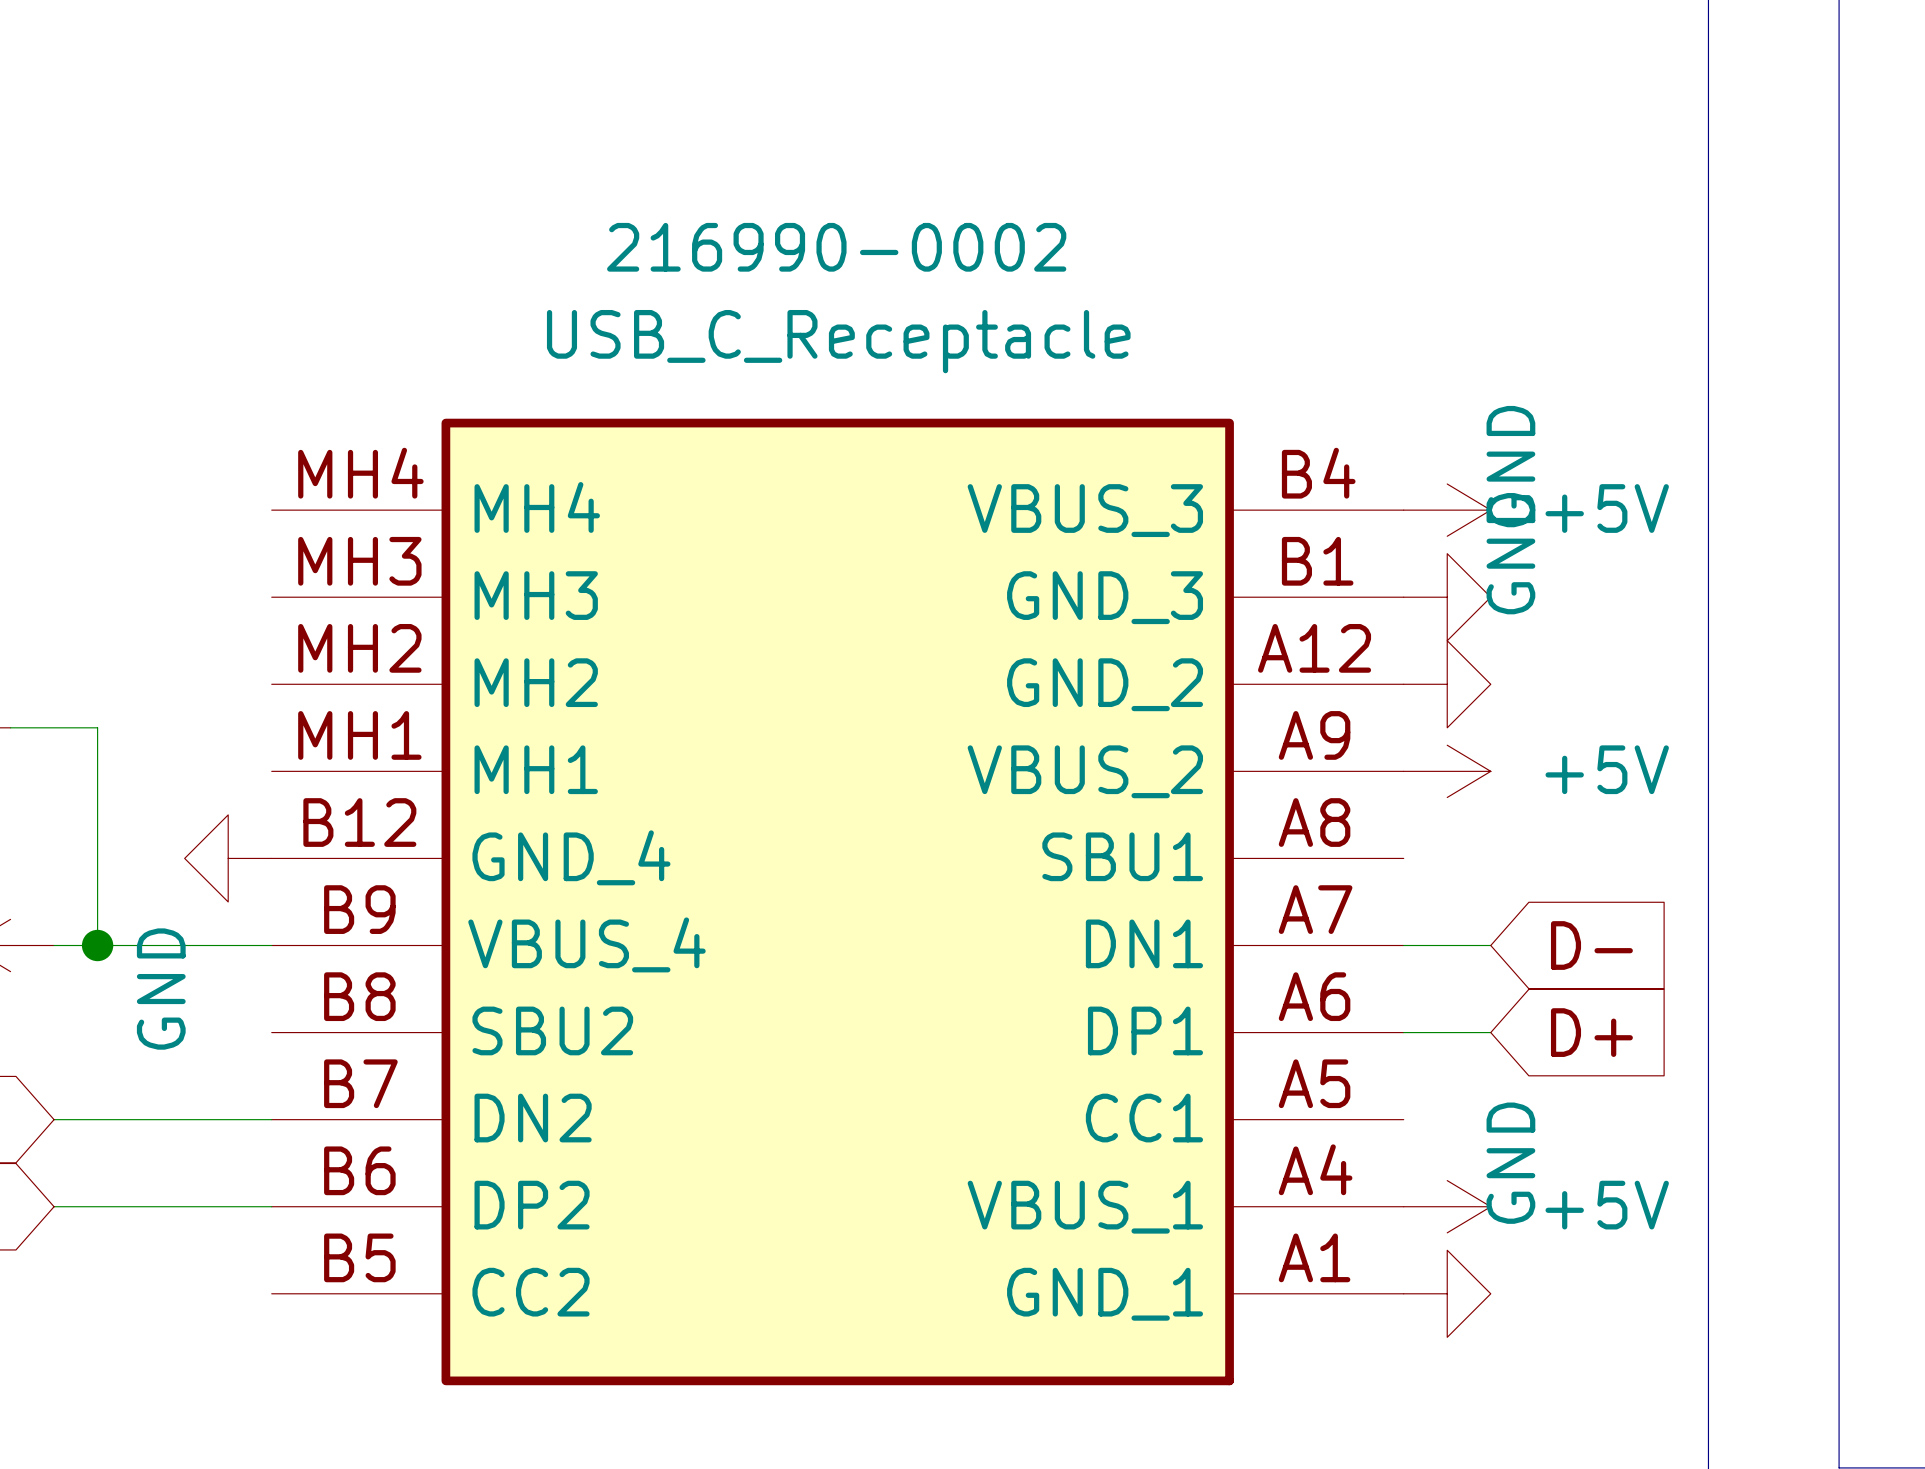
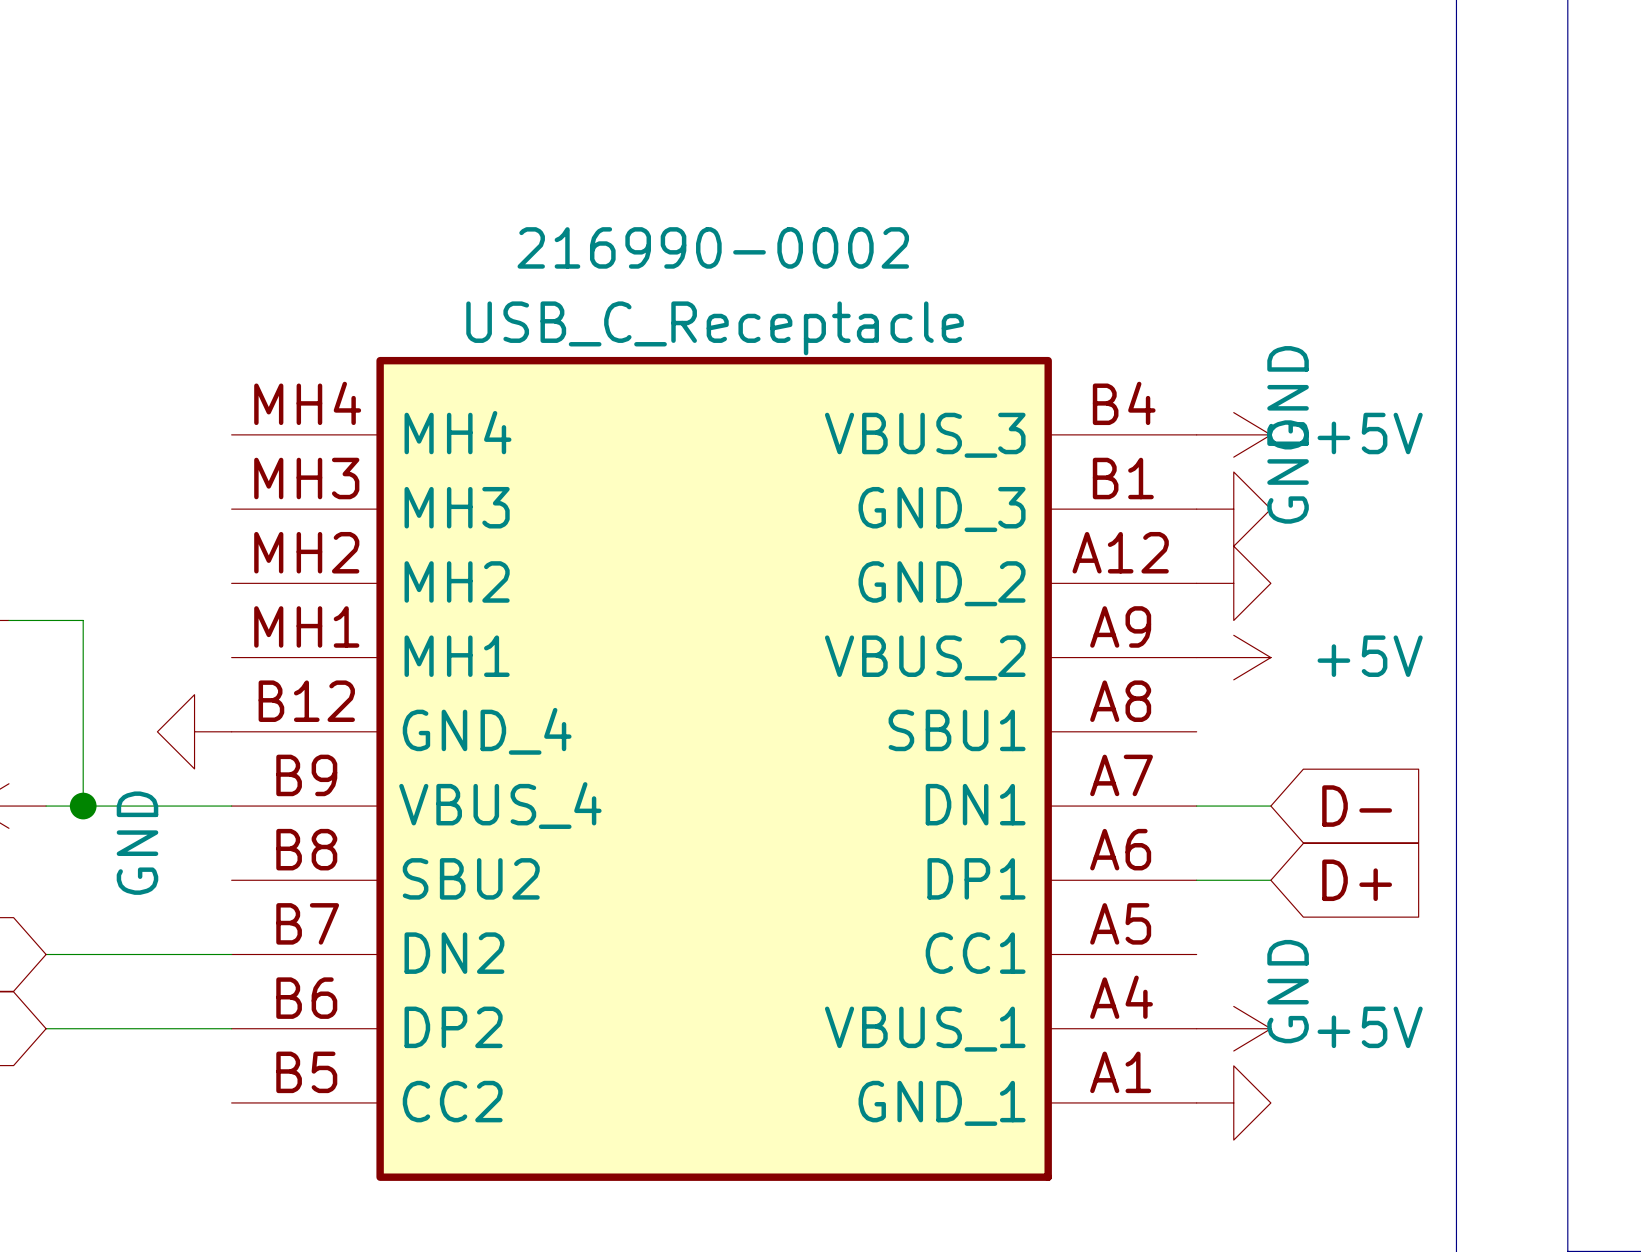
216990-0002 name position: 216990-0002 (836, 247) -> 216990-0002 (713, 247)
216990-0002 value position: USB_C_Receptacle (838, 341) -> USB_C_Receptacle (715, 328)

